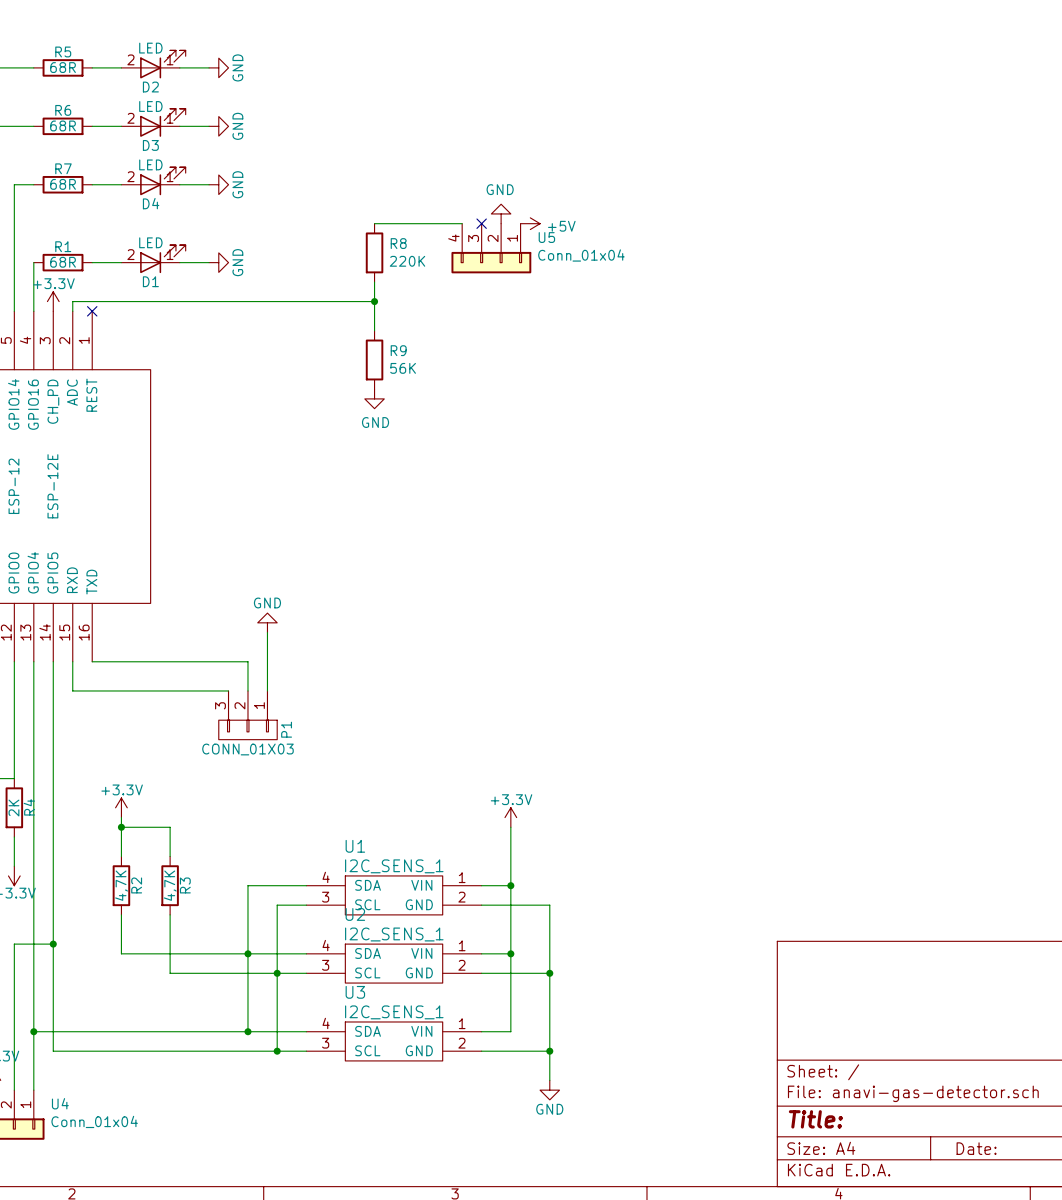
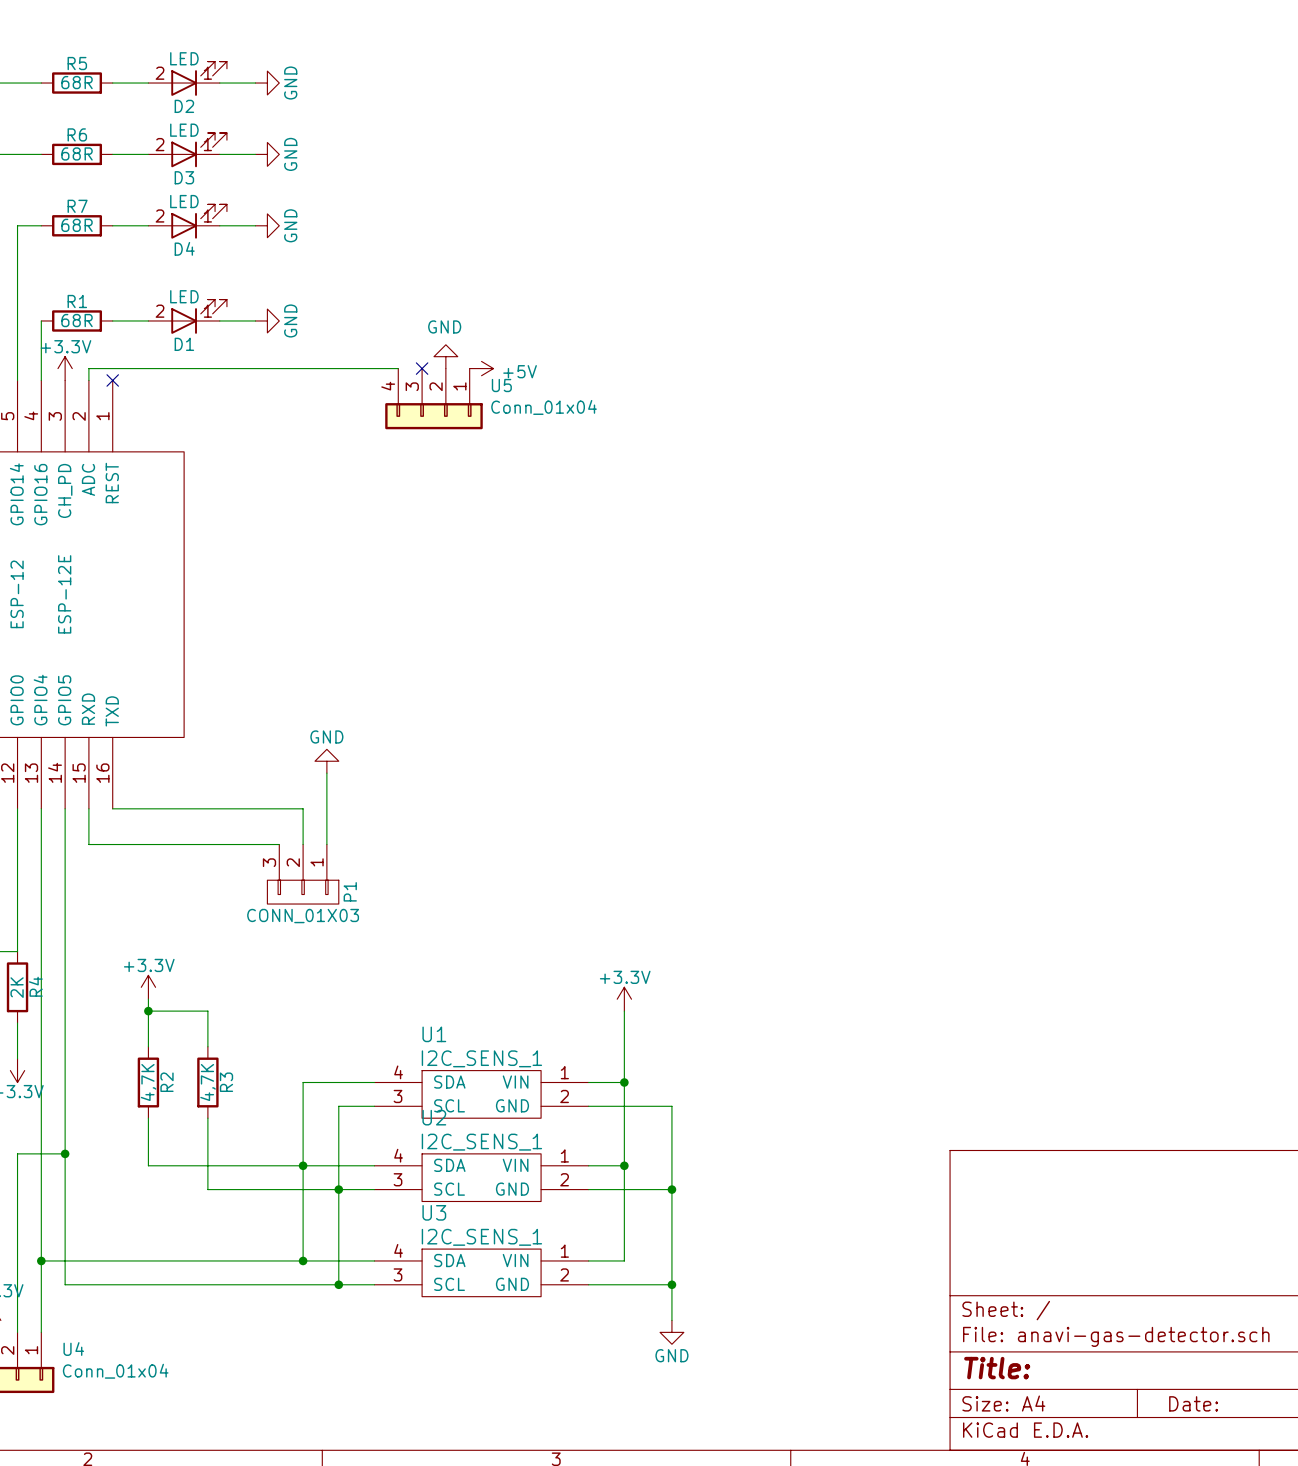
power symbol: GND (501, 213) -> none
wire: (374, 223) (462, 223) -> none
no-connect mark: (481, 223) -> none
power symbol position: +5V (530, 223) -> +5V (481, 368)
U5 position: (491, 248) -> (433, 398)
R8: 220K (374, 252) -> none
wire: (374, 282) (374, 330) -> none
power symbol: none -> GND (445, 356)
wire: (325, 301) (374, 301) -> none
no-connect mark: none -> (422, 368)
junction: (374, 301) -> none
R9: 56K (374, 359) -> none
power symbol: GND (374, 398) -> none

